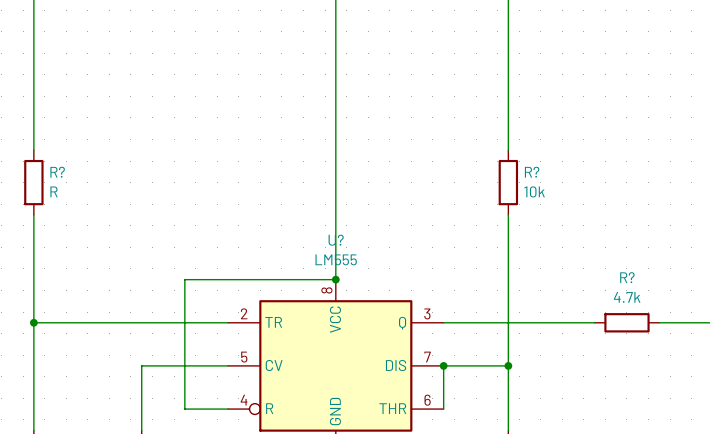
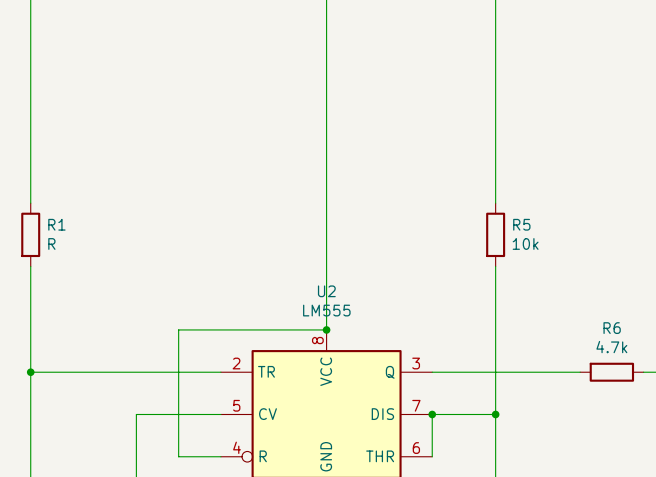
R? name: R? (57, 172) -> R1 (56, 224)
R? name: R? (532, 172) -> R5 (521, 224)
U? name: U? (336, 240) -> U2 (326, 291)
R? name: R? (627, 277) -> R6 (612, 328)

